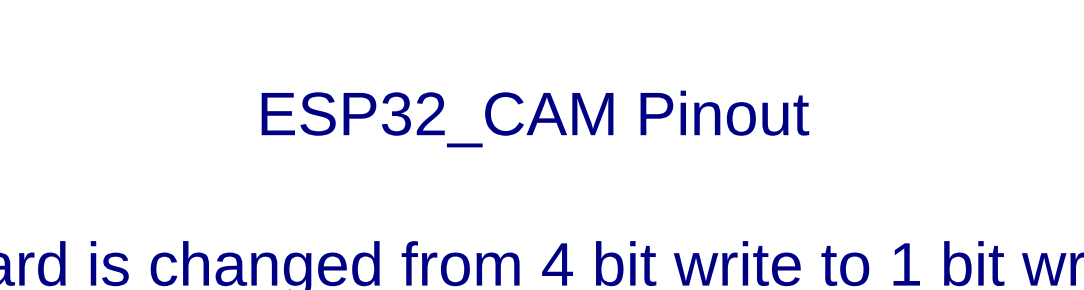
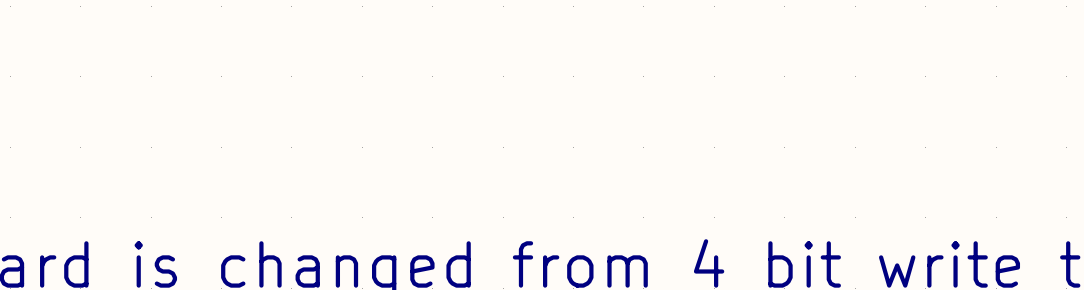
text: ESP32_CAM Pinout (535, 119) -> none

